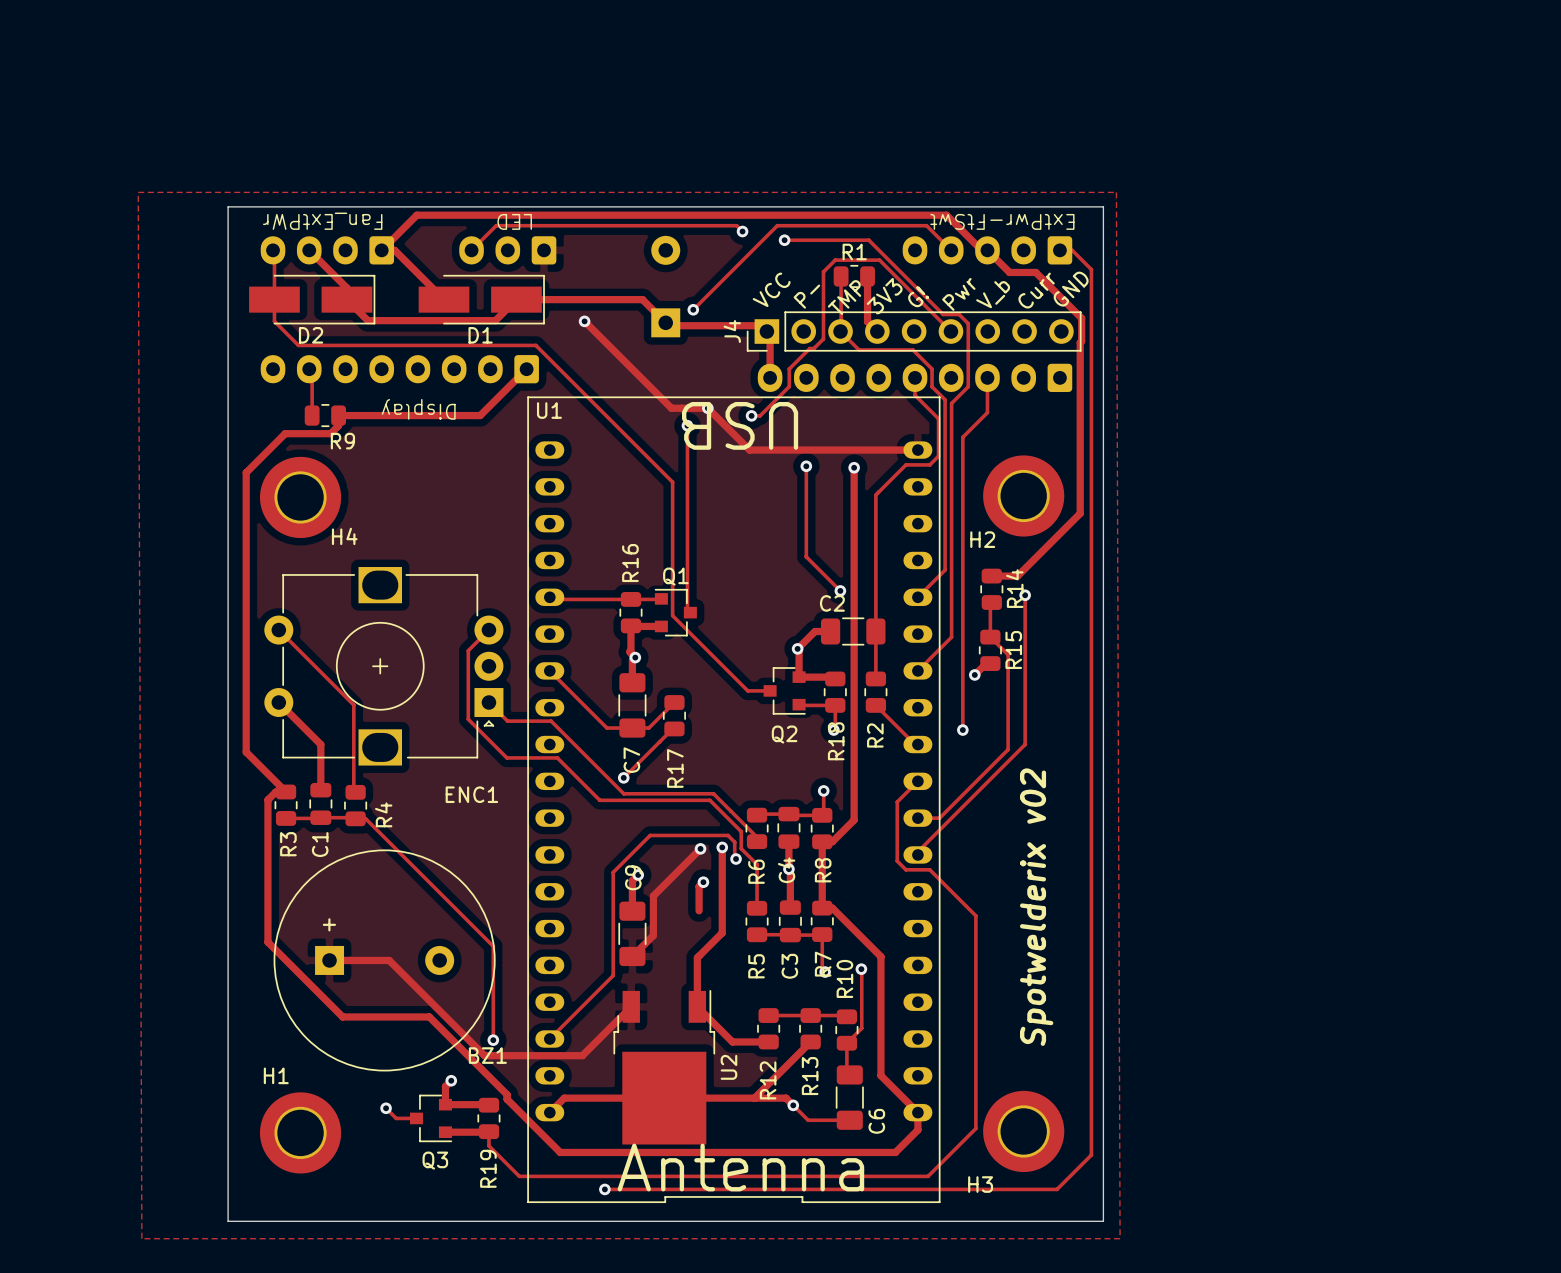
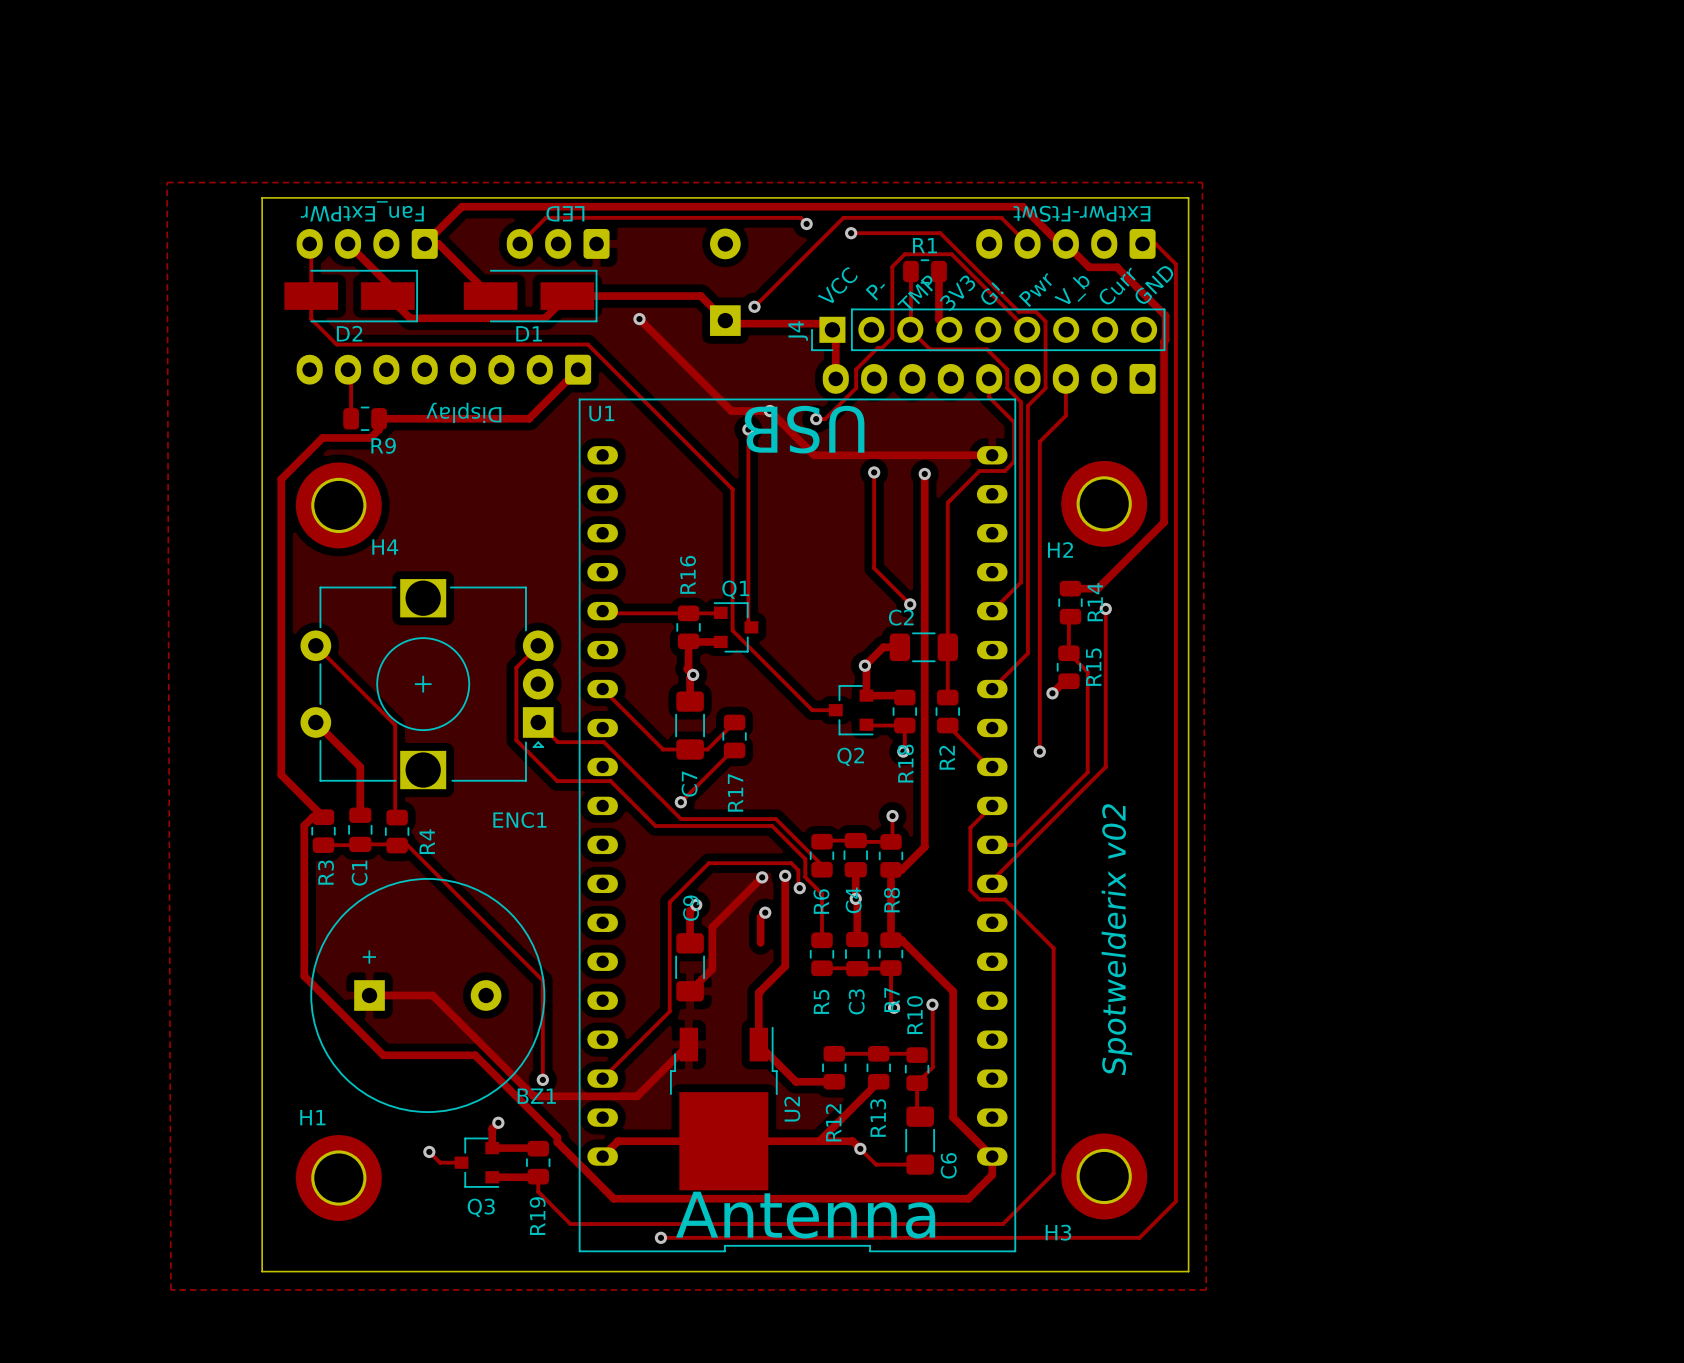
ENC1 footprint: [264, 567, 504, 766] -> [300, 579, 554, 790]

